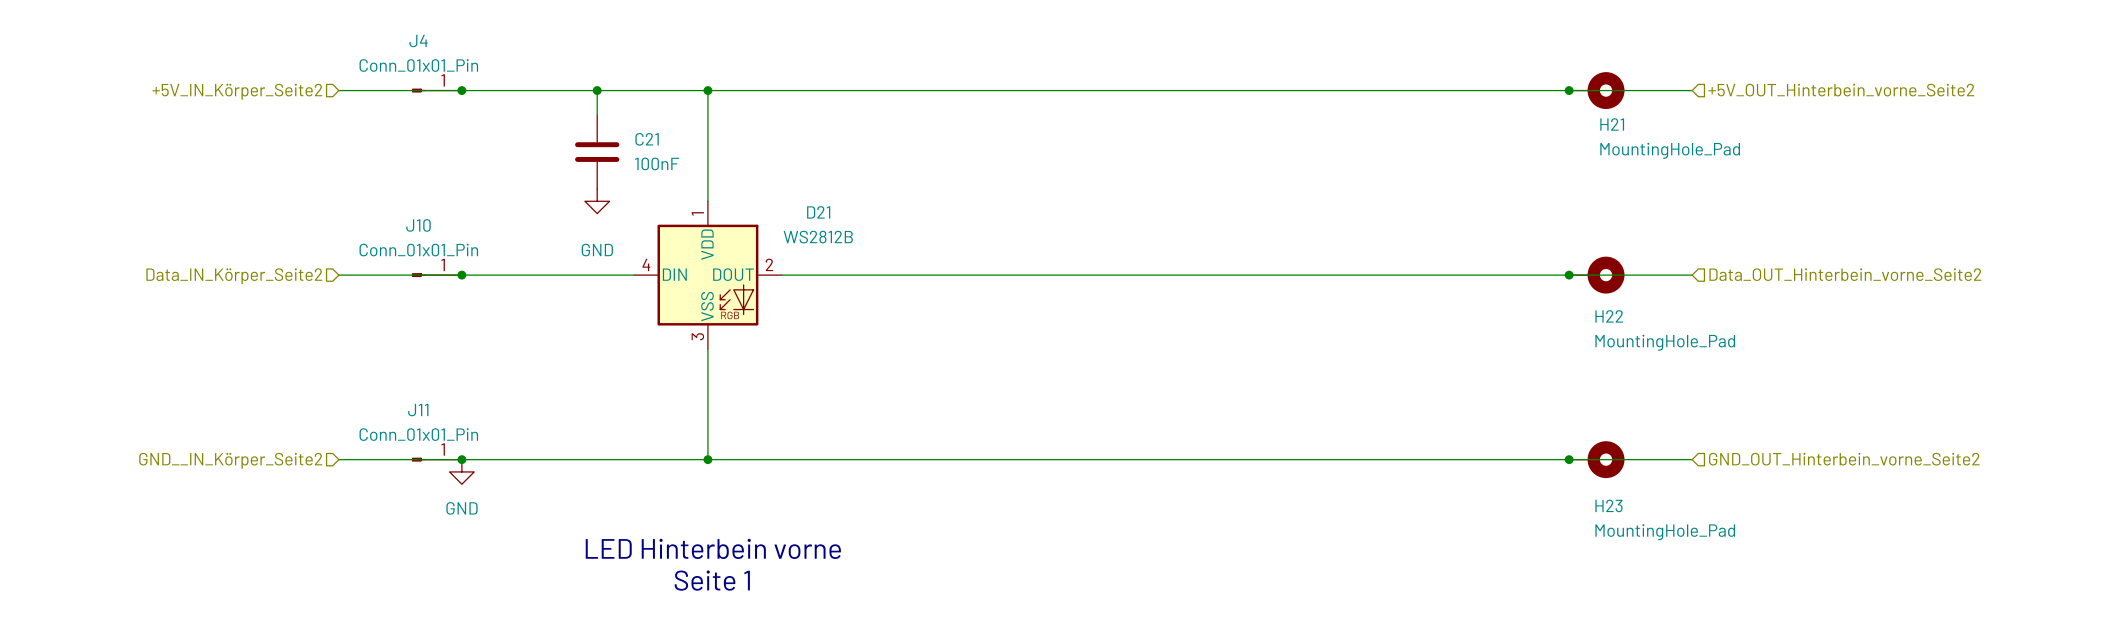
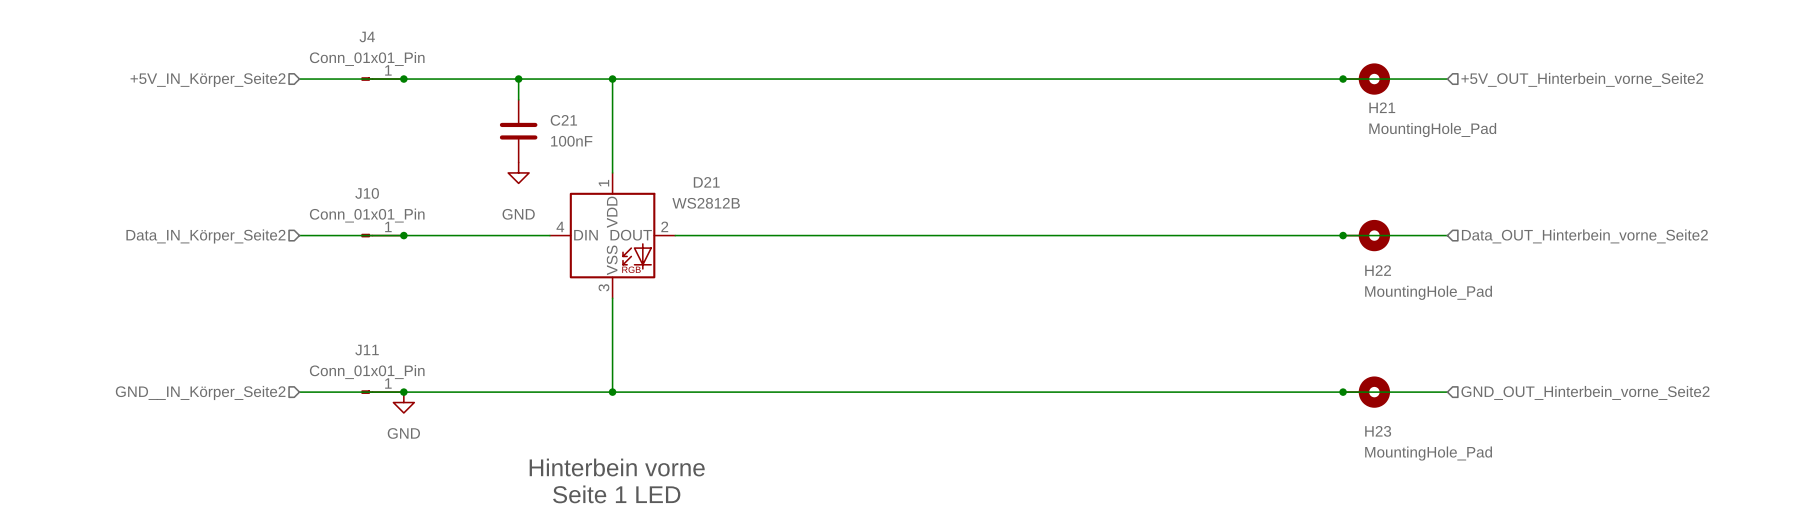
text: LED Hinterbein vorne (713, 548) -> Hinterbein vorne (617, 467)
text: Seite 1 (712, 580) -> Seite 1 LED (616, 494)

